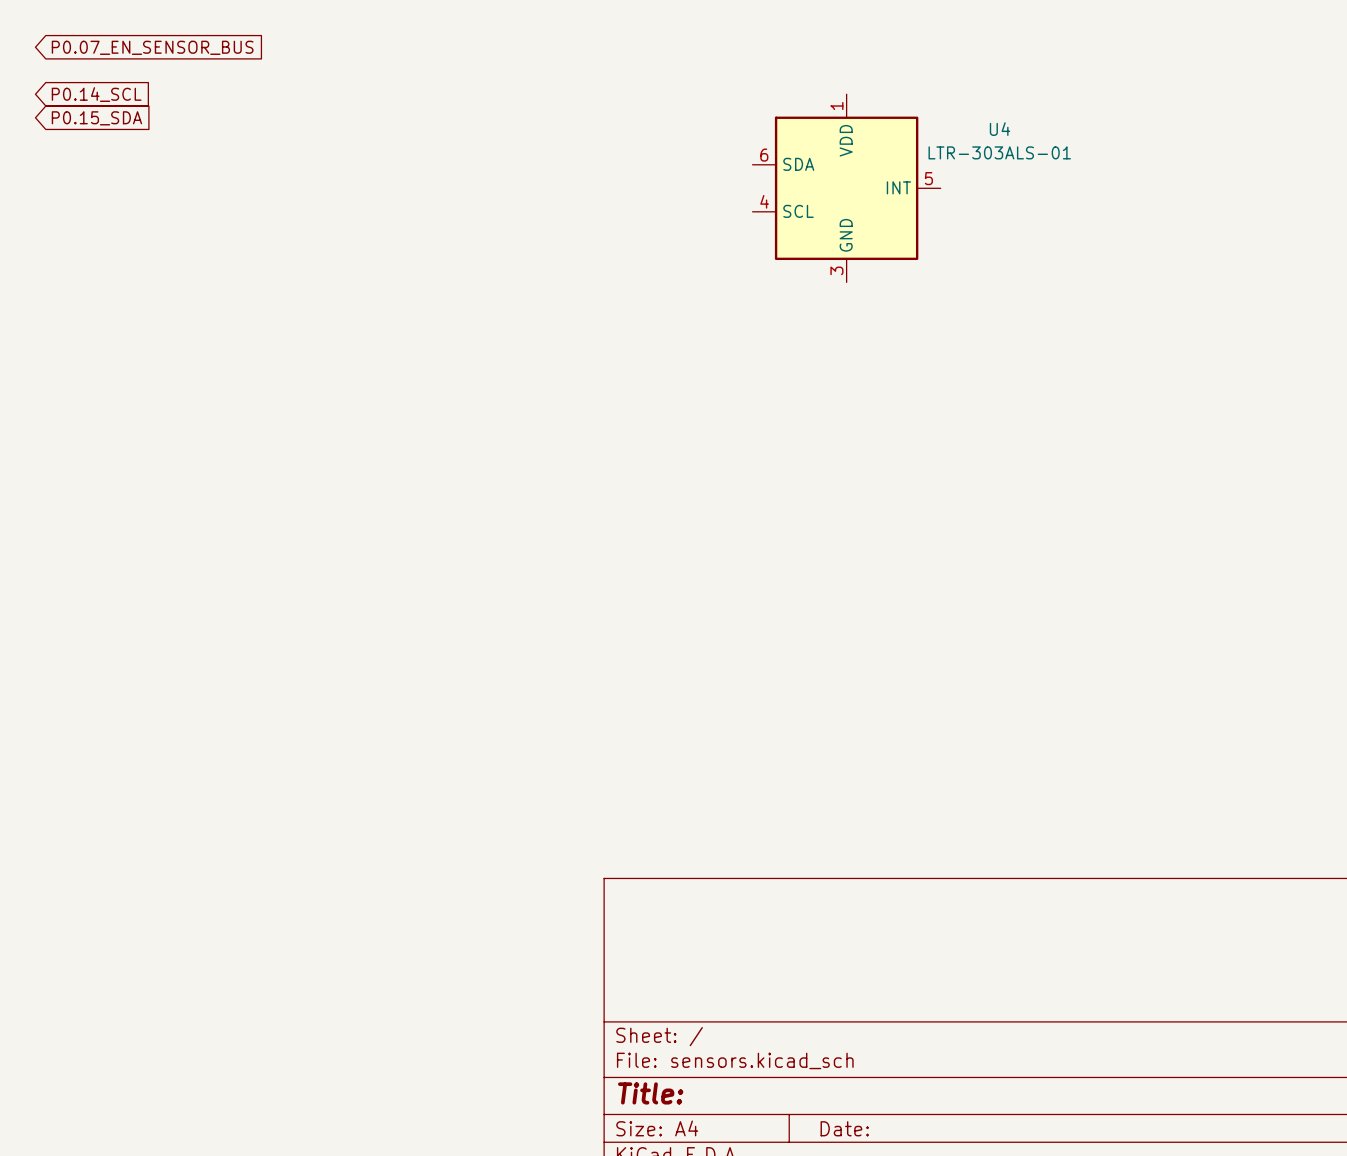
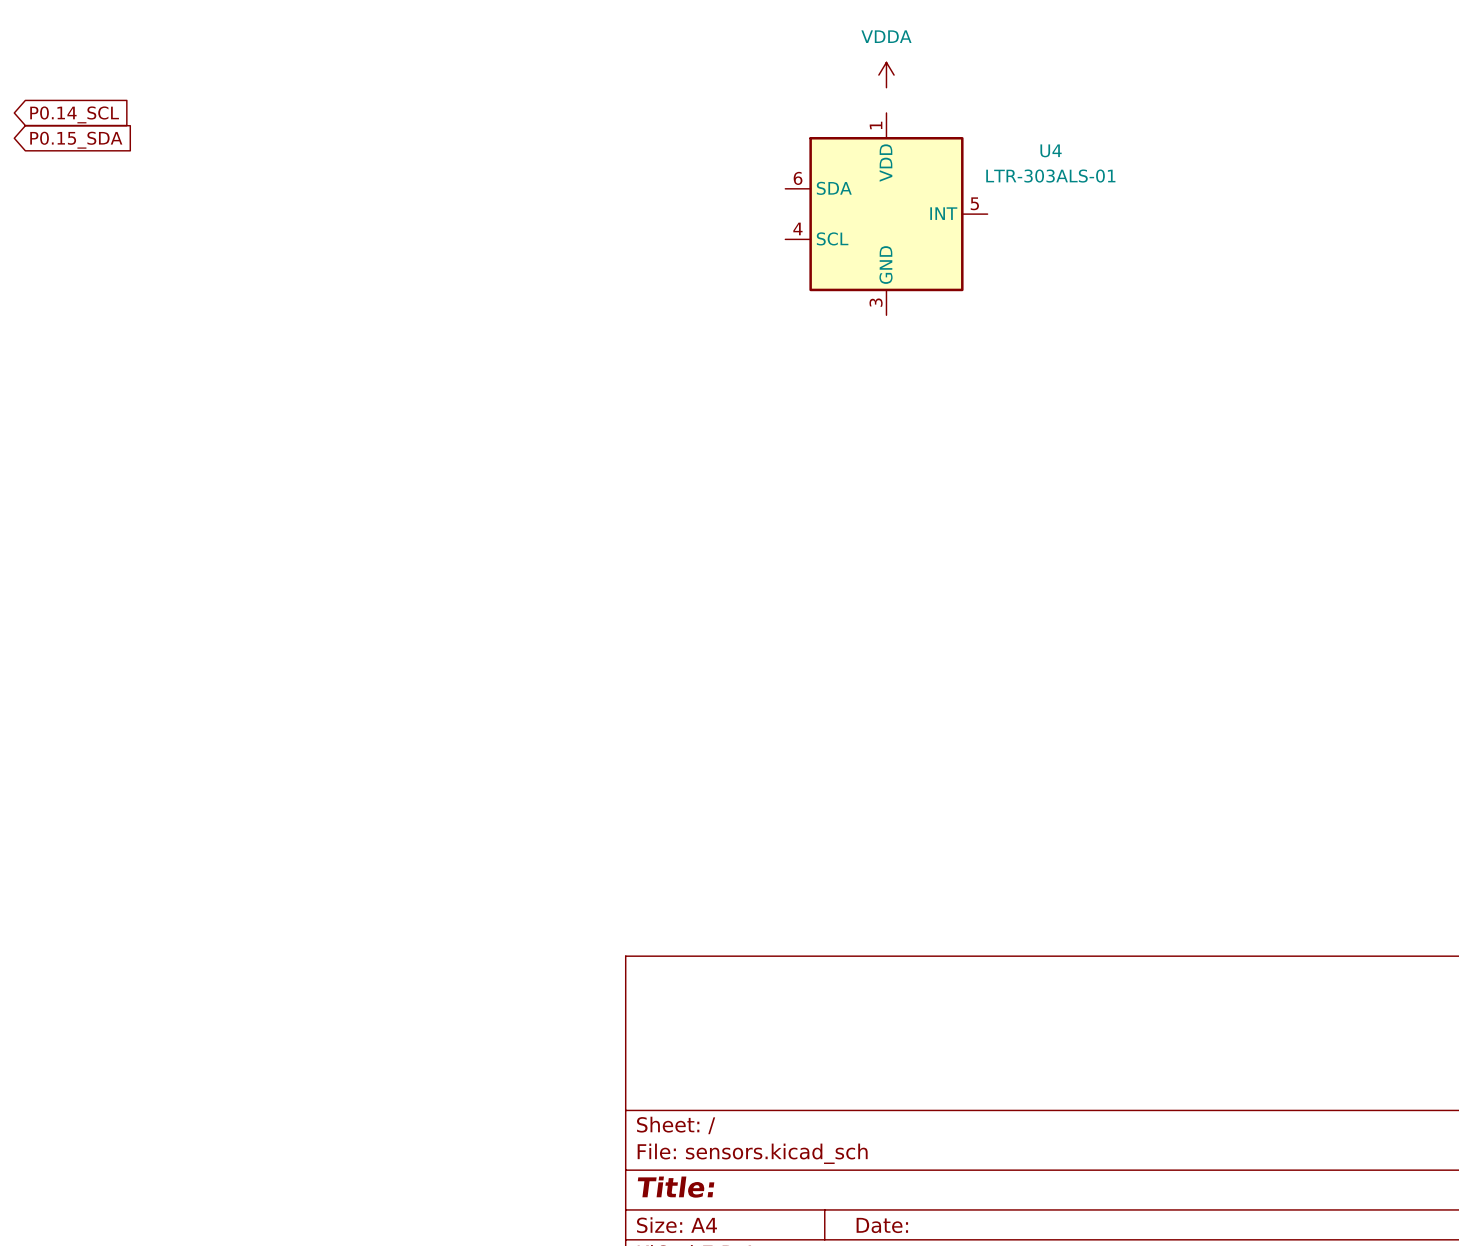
global label: P0.07_EN_SENSOR_BUS (152, 47) -> none
power symbol: none -> VDDA (886, 75)

